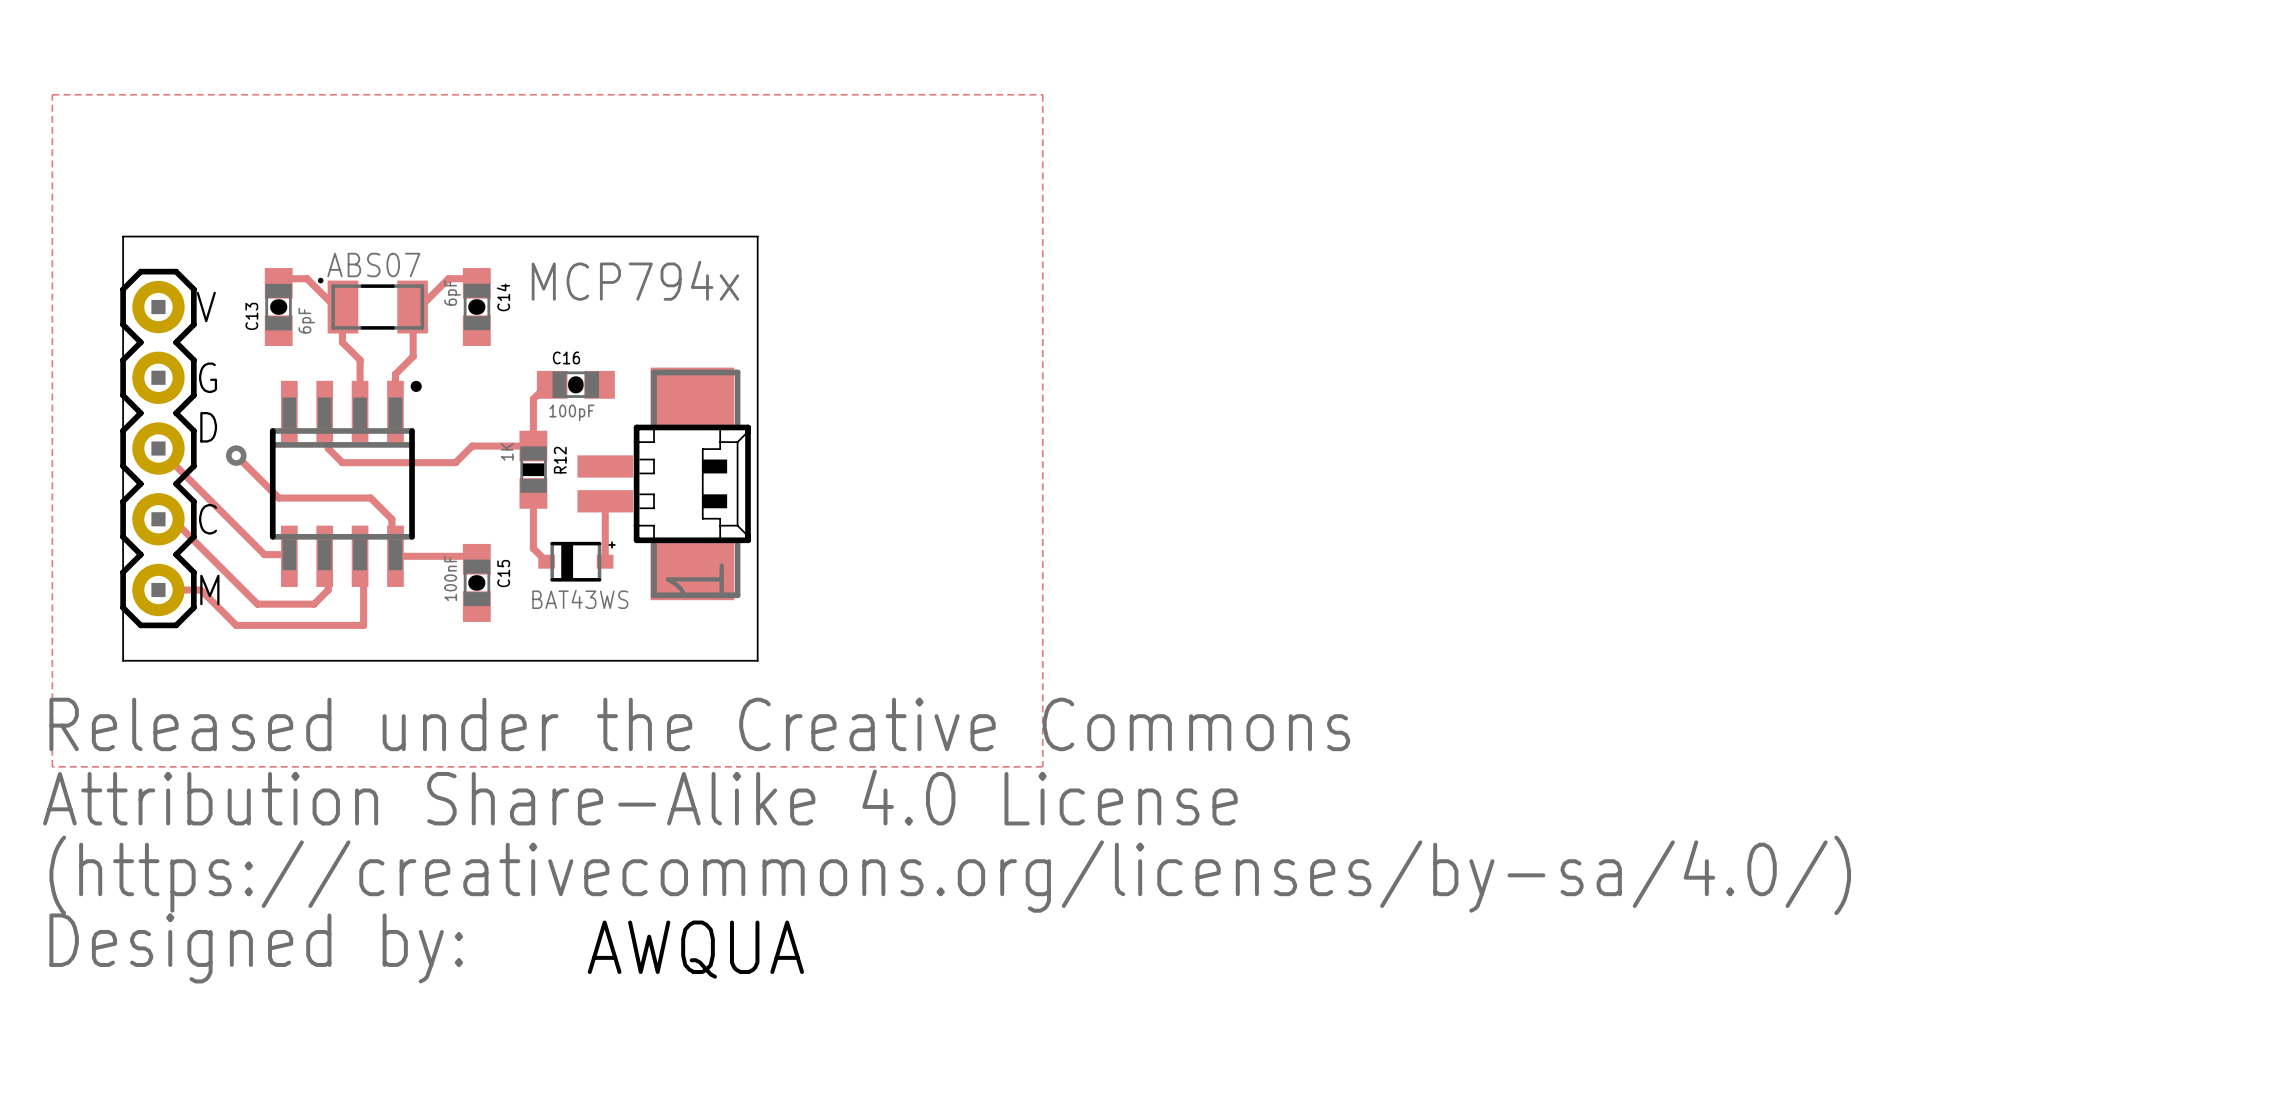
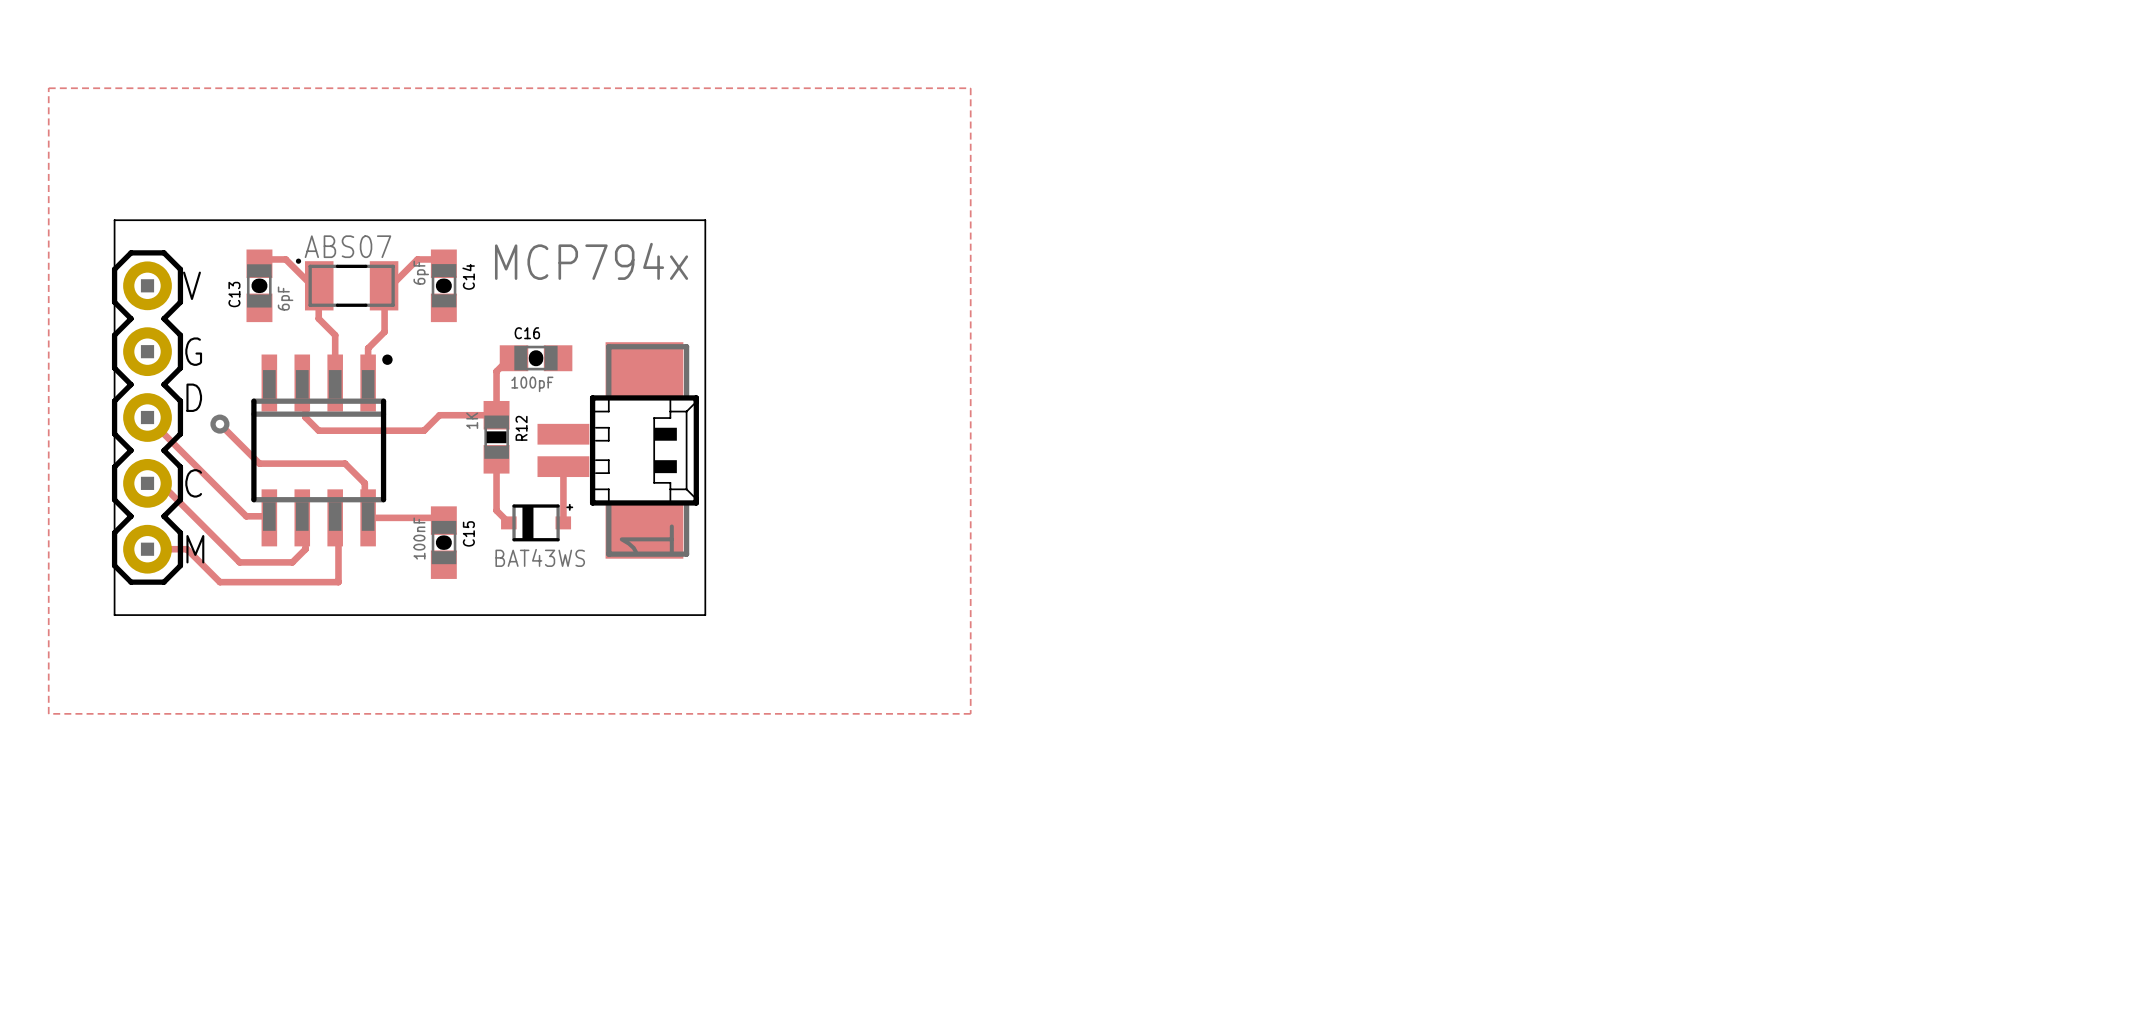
drawing: [43, 697, 1852, 984] -> none
text: AWQUA (695, 949) -> none

